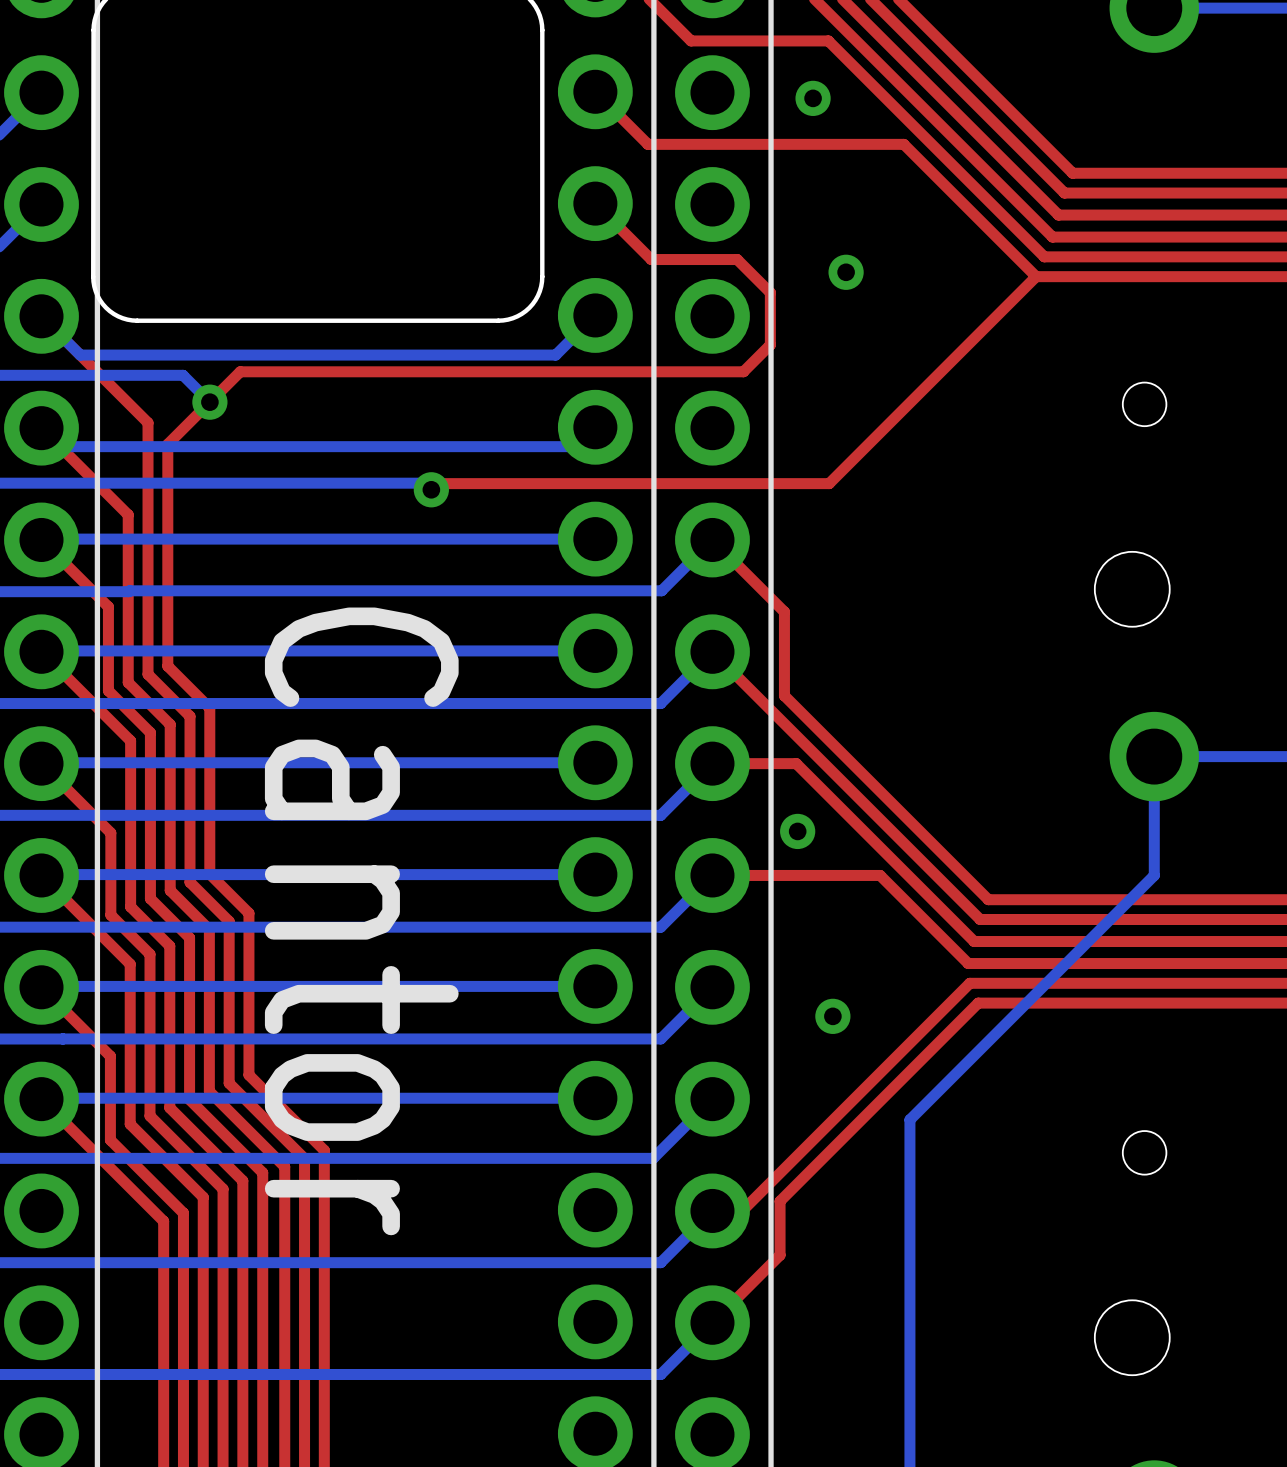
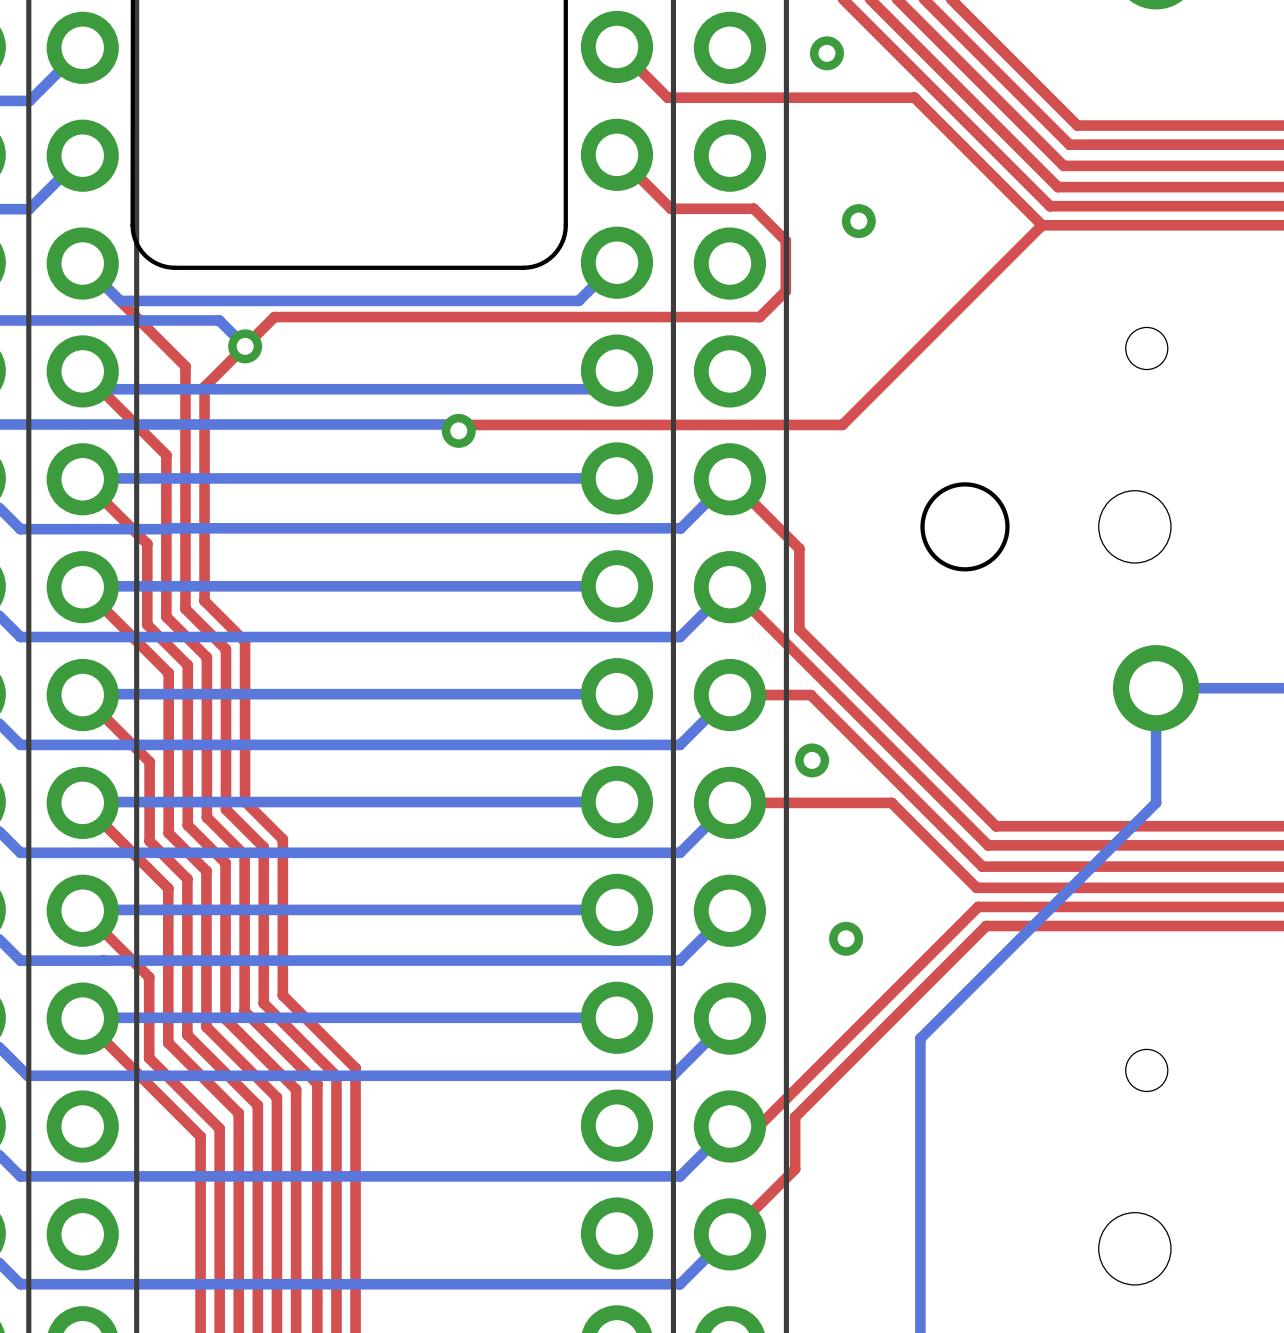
round board edge: none -> [920, 482, 1010, 572]
text: Cantor (361, 921) -> none

